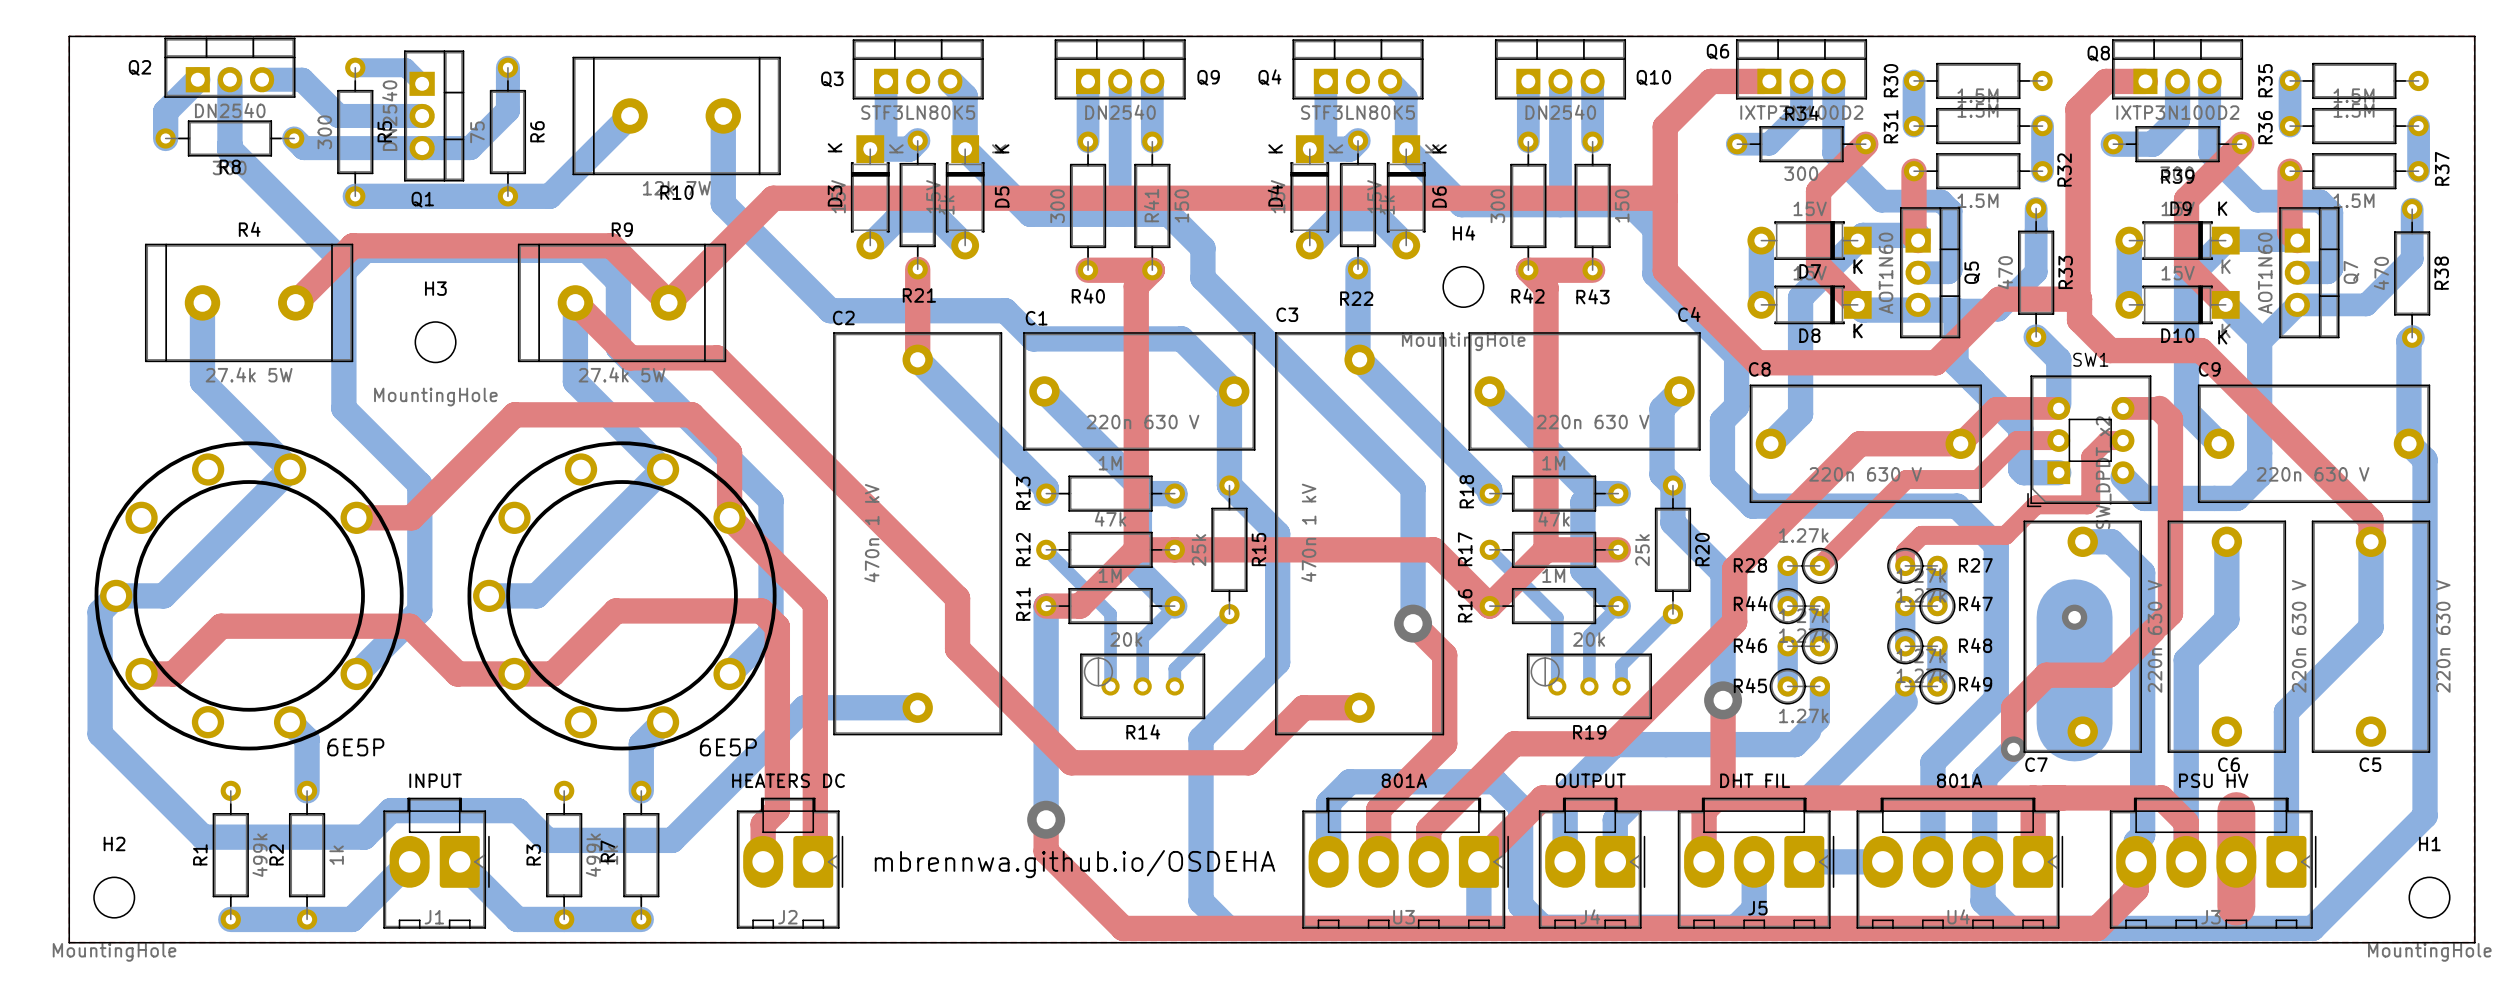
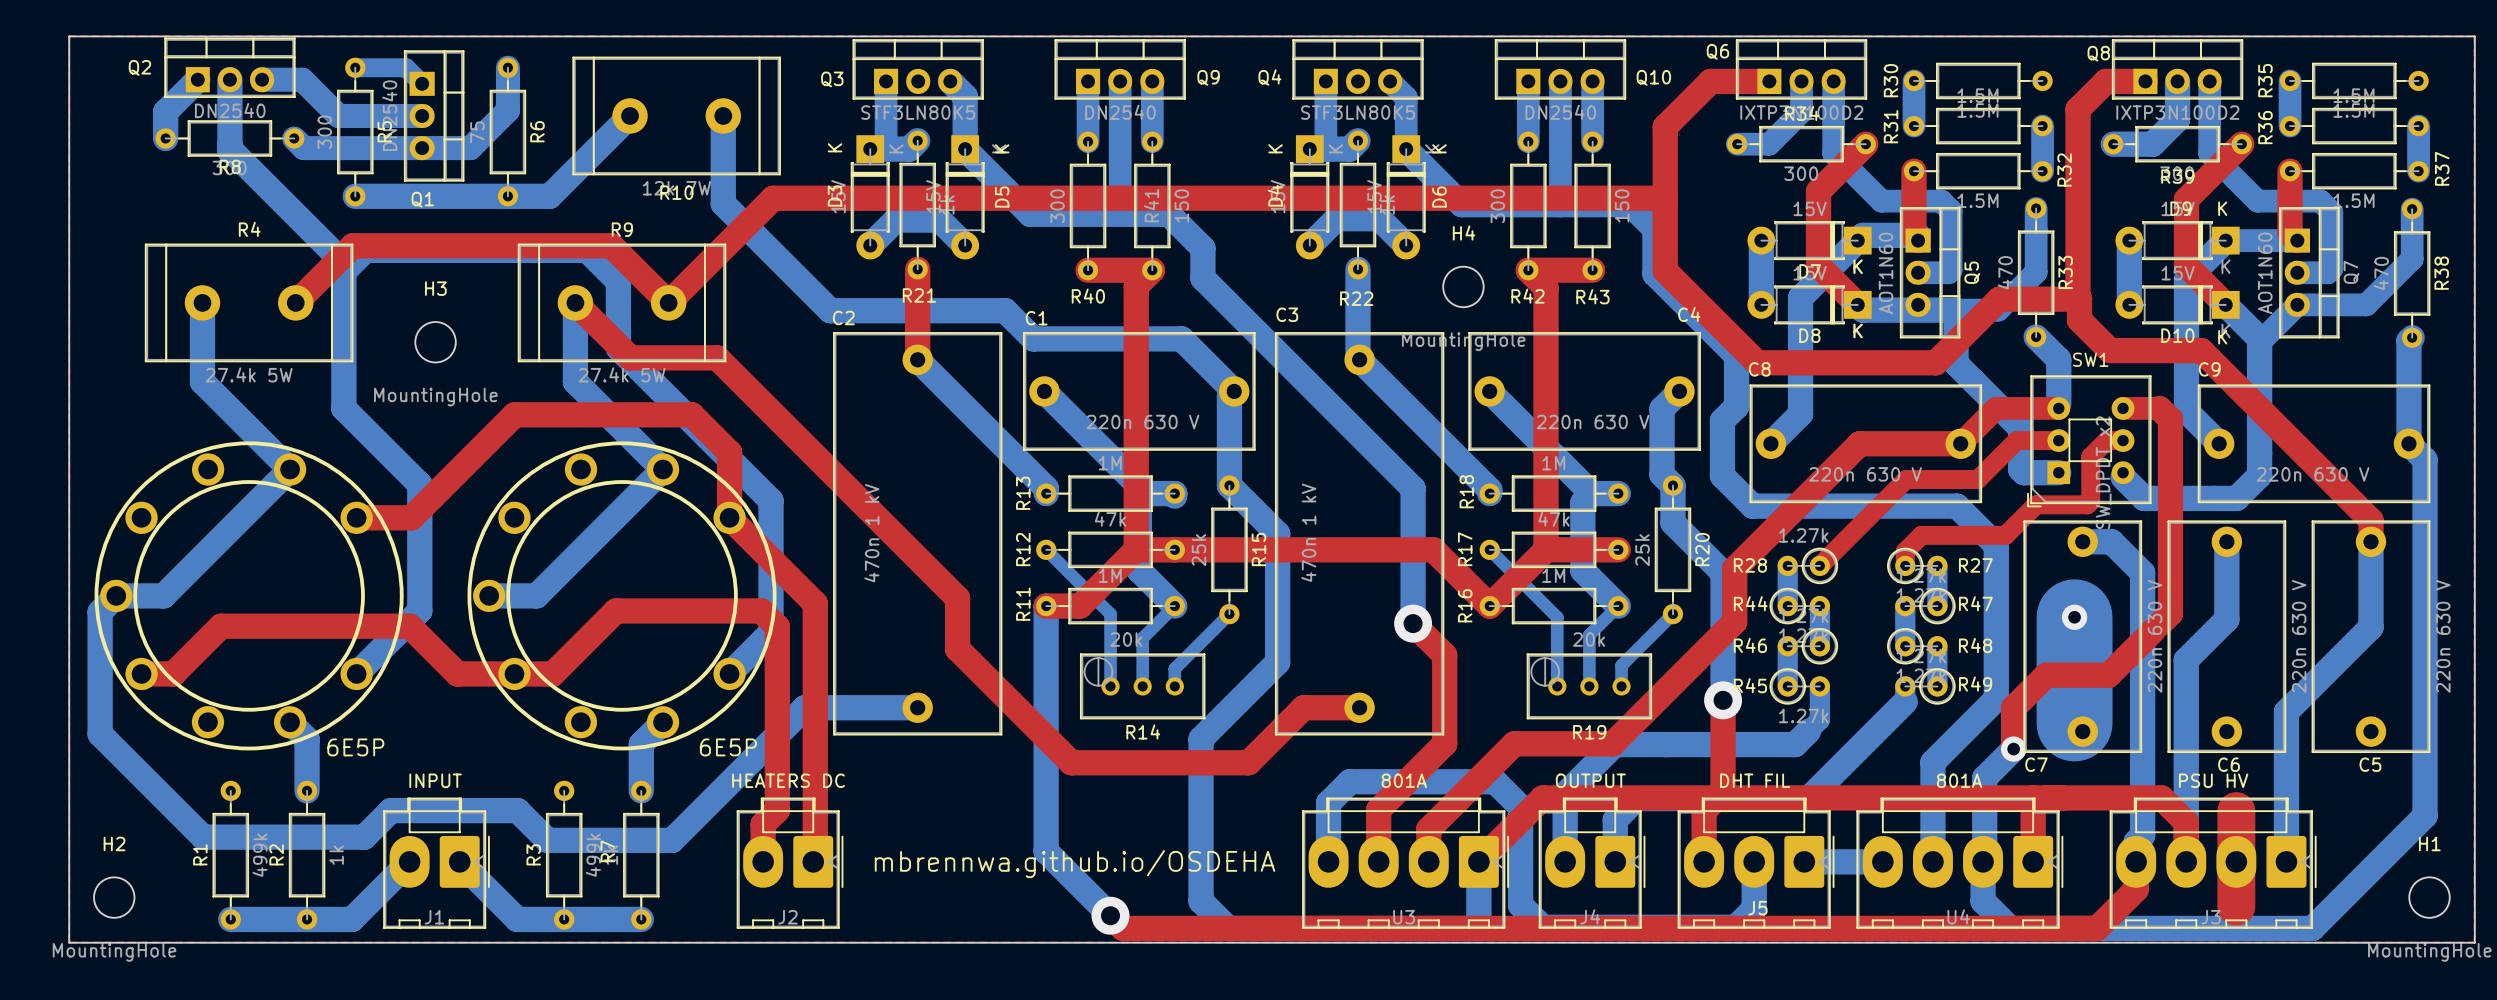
bottom track: none -> (1046, 819) (1046, 851) (1110, 915)
top track: (1046, 819) (1046, 851) (1110, 915) -> none
via: (1046, 819) -> none
via: none -> (1110, 915)

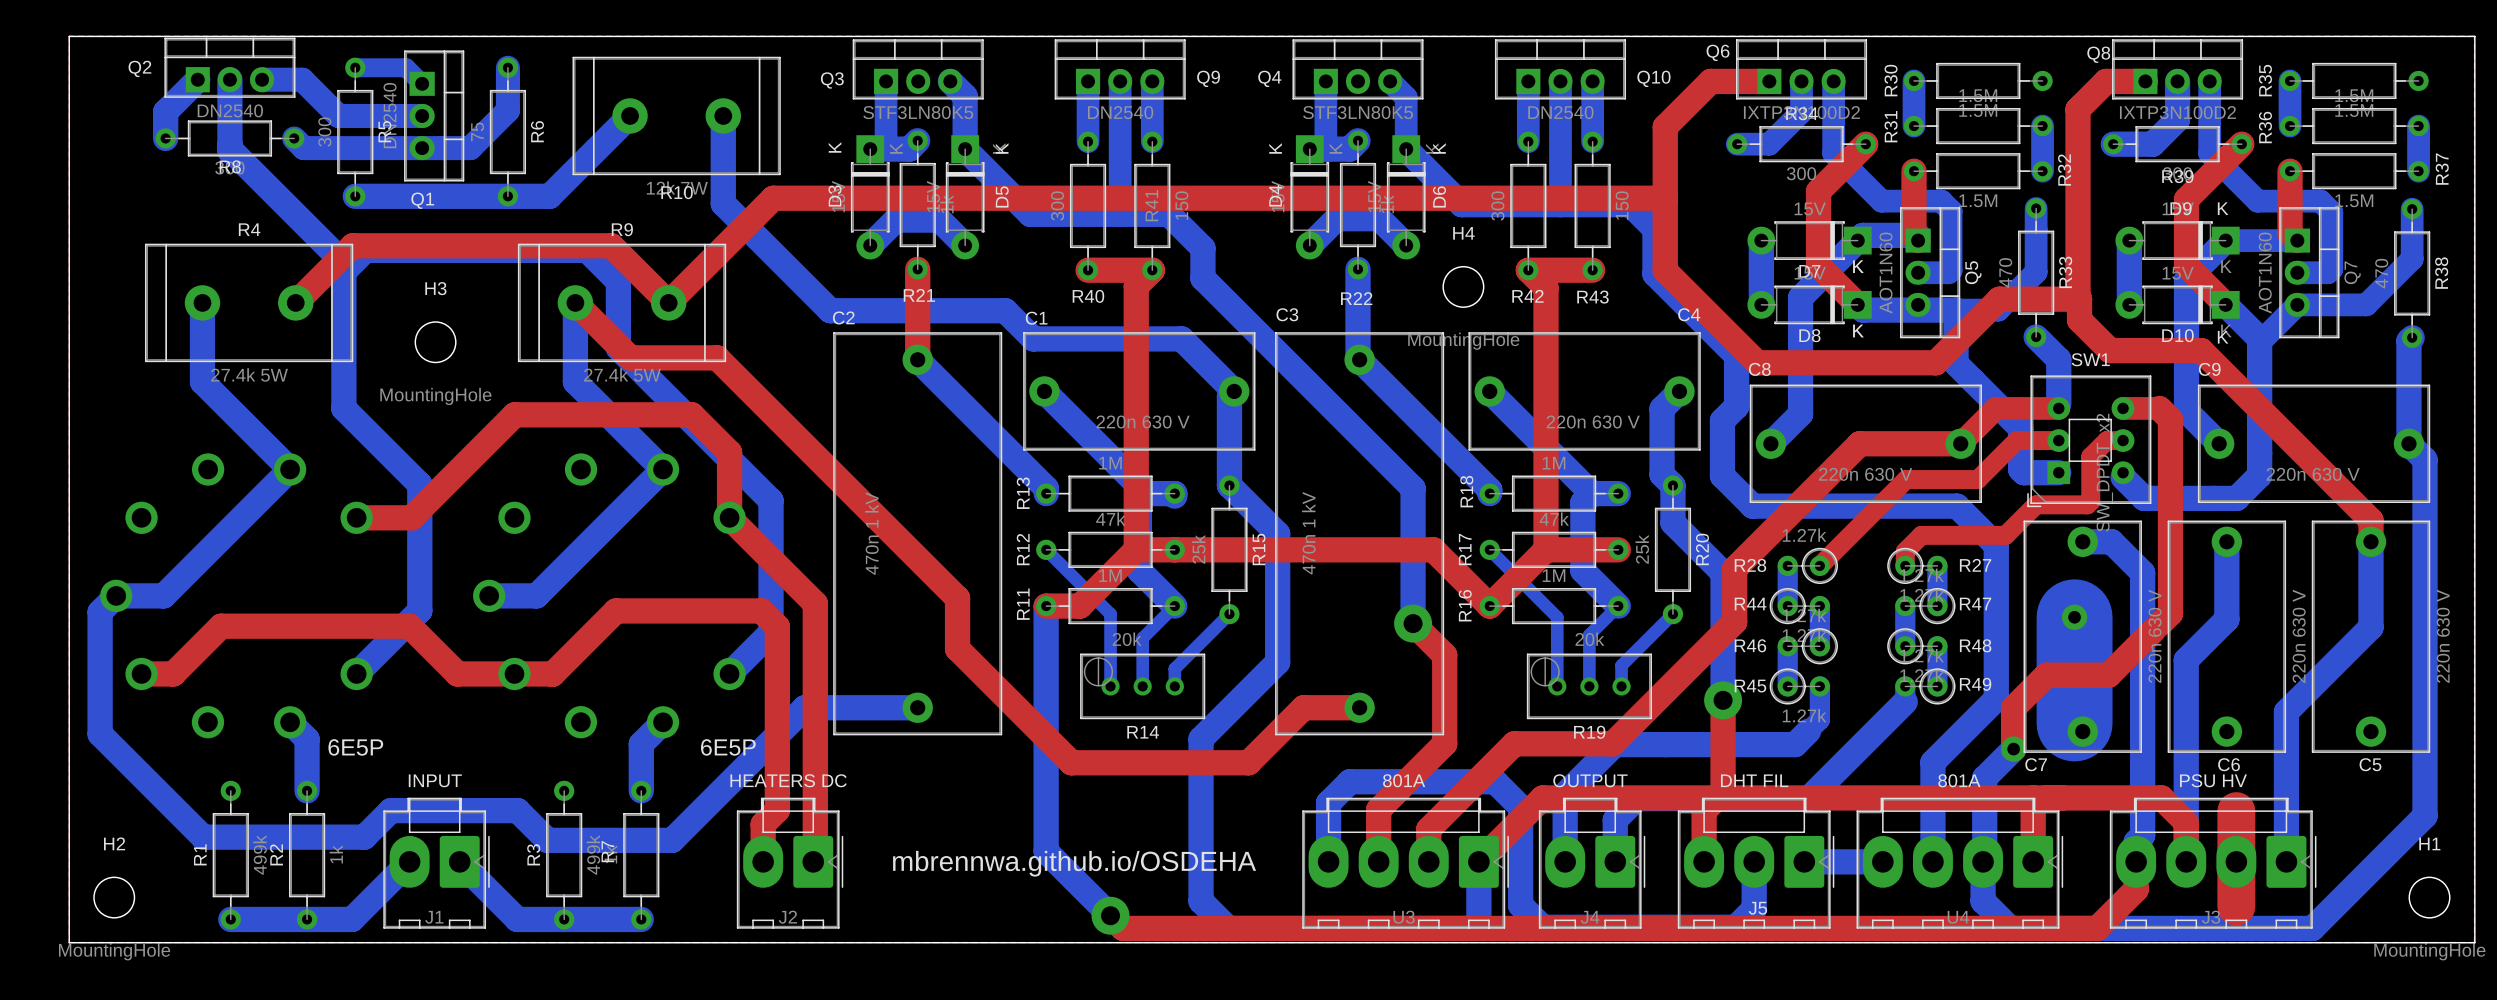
part footprint: [94, 441, 404, 751] -> [100, 453, 373, 739]
part footprint: [467, 441, 777, 751] -> [473, 453, 746, 739]

